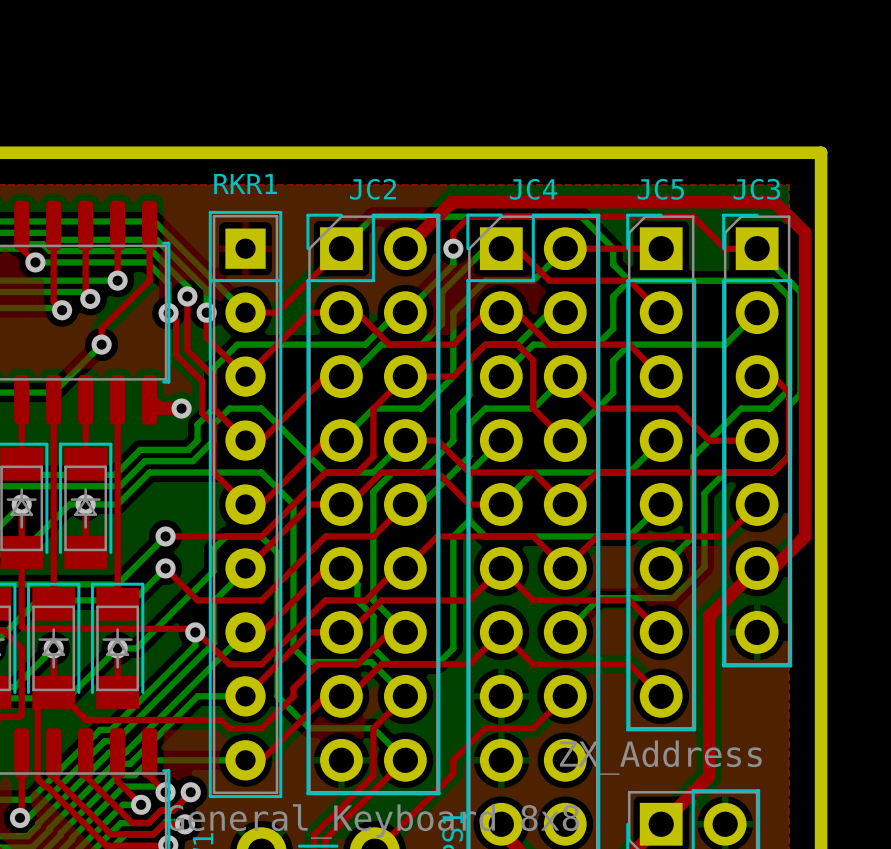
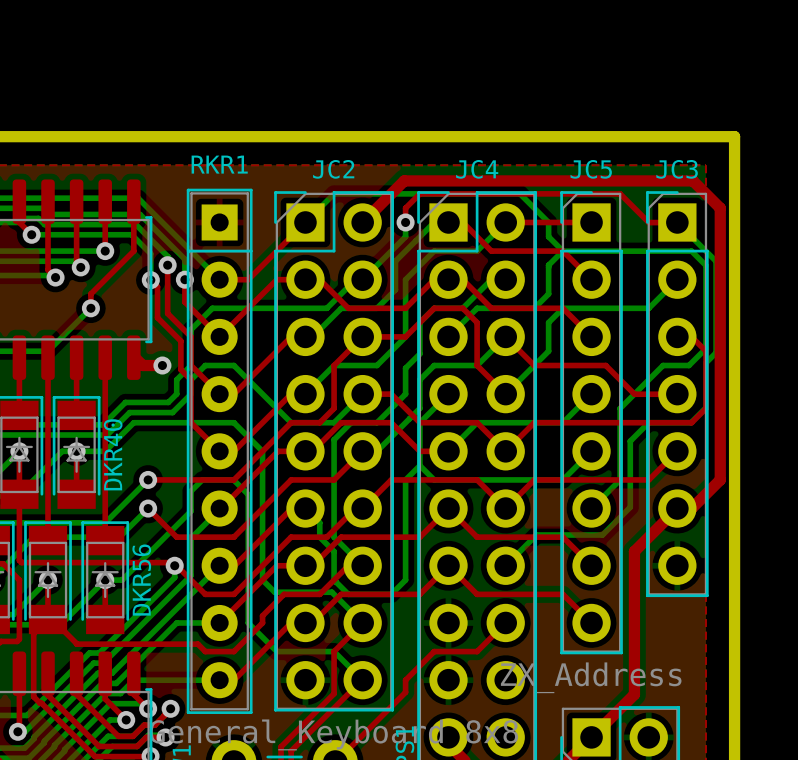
DKR40 name: none -> DKR40 (113, 454)
DKR56 name: none -> DKR56 (141, 580)

